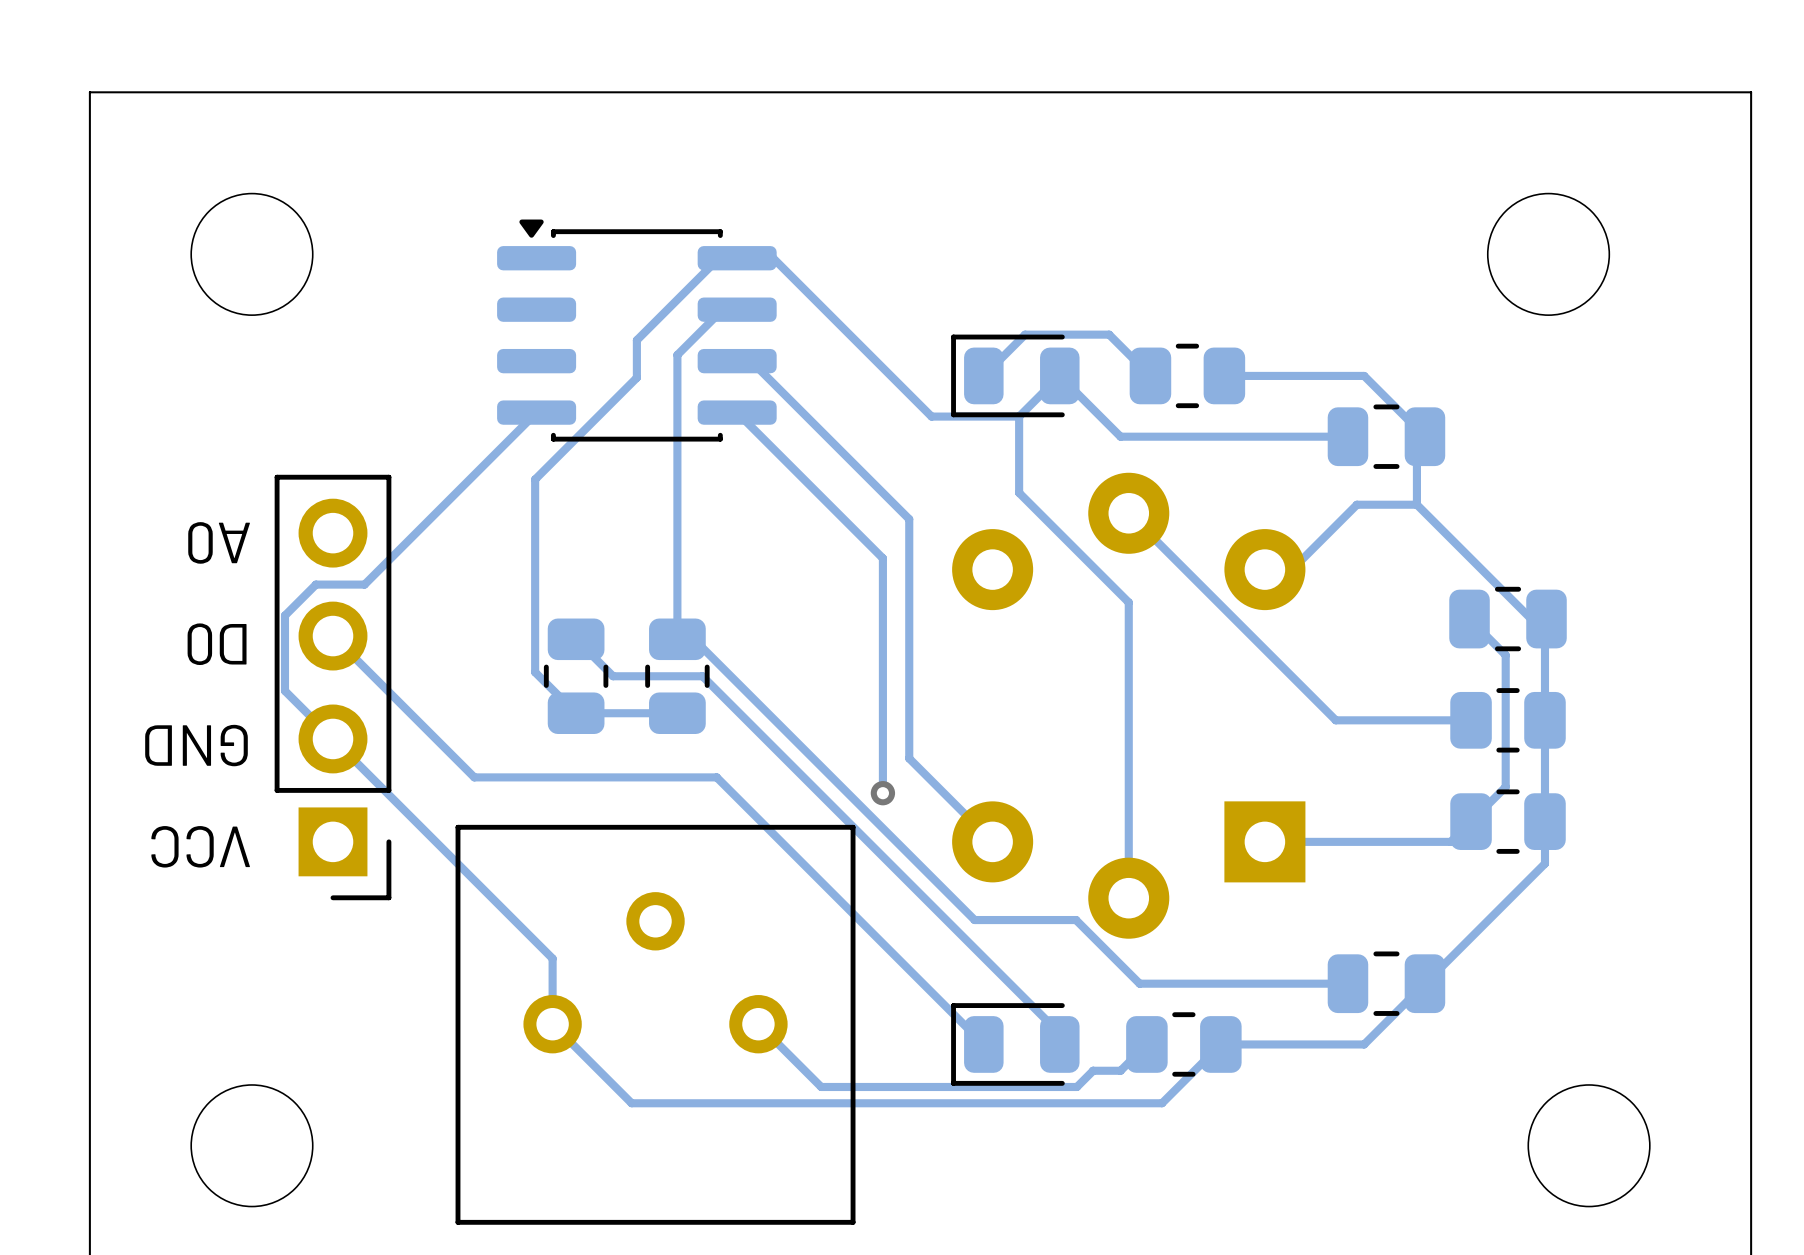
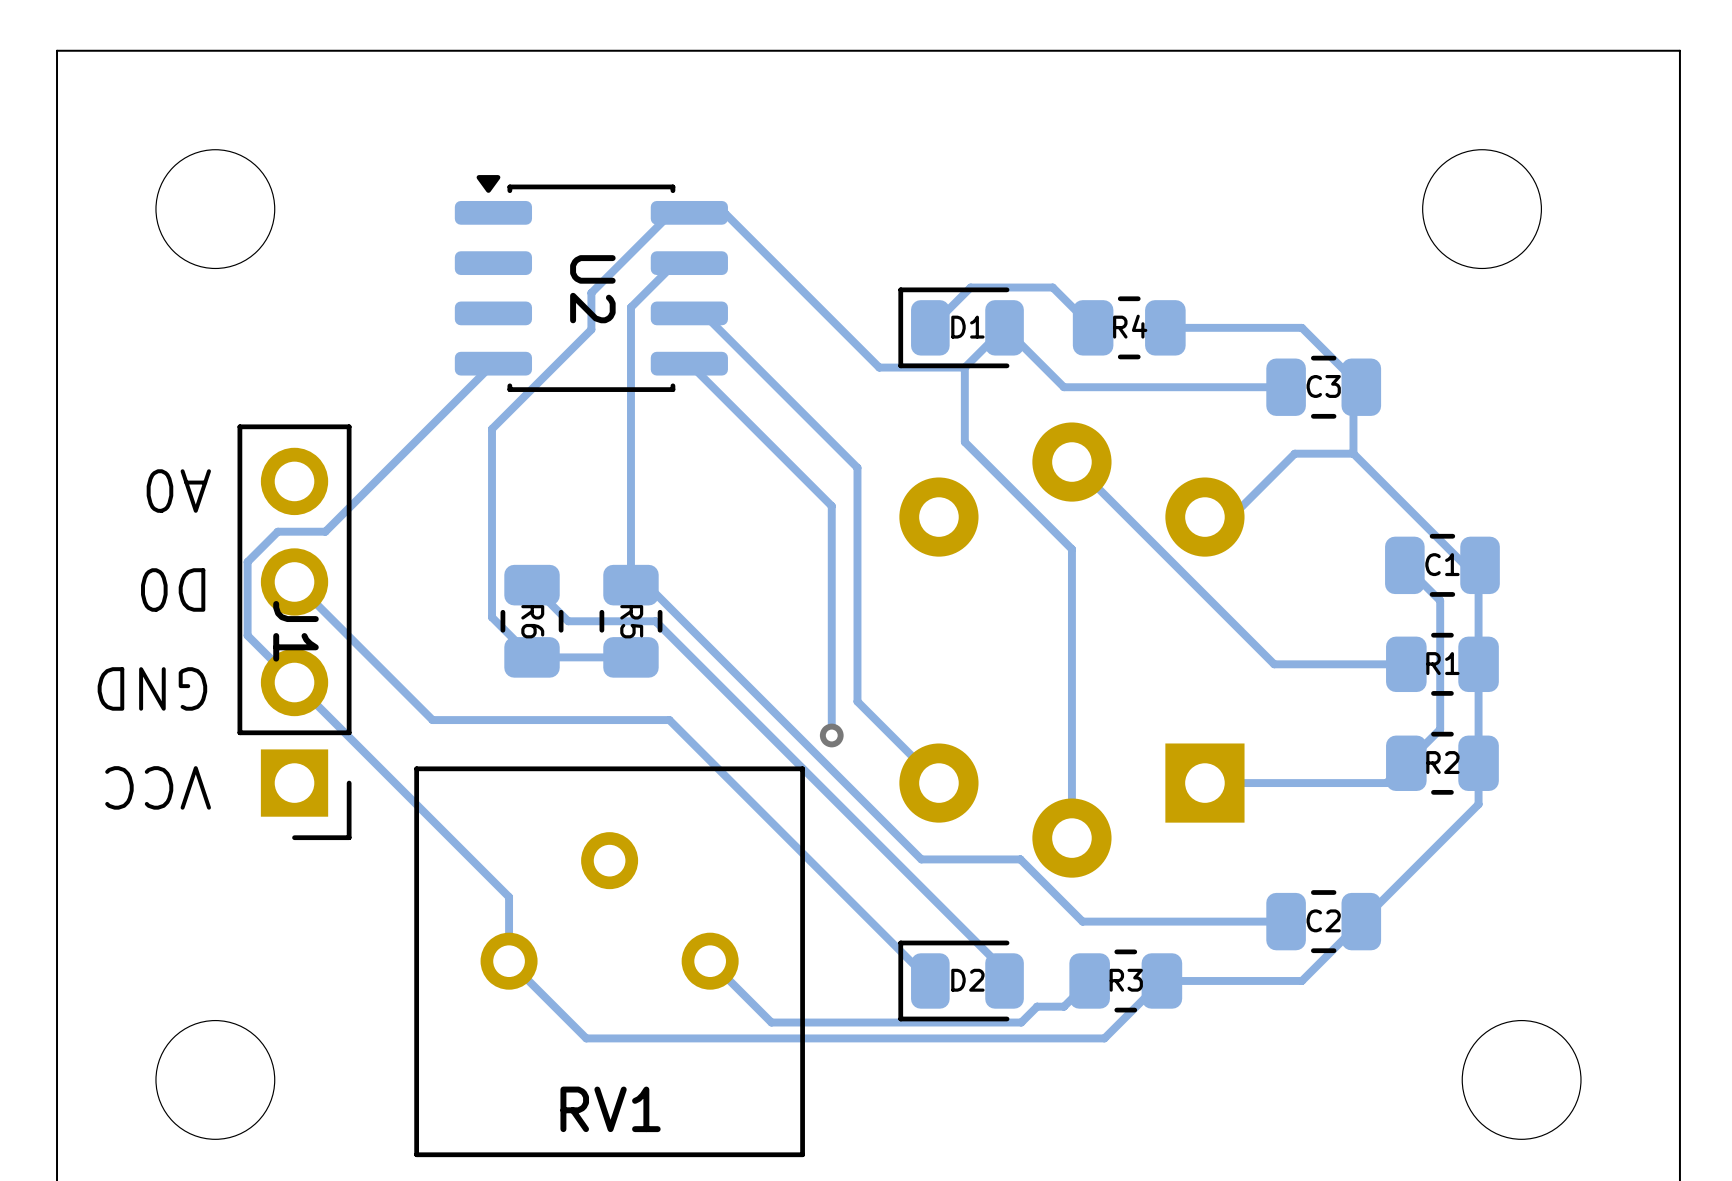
U2 name: none -> U2 (592, 289)
D1 name: none -> D1 (967, 327)
R4 name: none -> R4 (1130, 326)
C3 name: none -> C3 (1323, 386)
C1 name: none -> C1 (1442, 564)
R6 name: none -> R6 (532, 621)
R5 name: none -> R5 (631, 621)
J1 name: none -> J1 (295, 631)
R1 name: none -> R1 (1442, 663)
R2 name: none -> R2 (1442, 762)
C2 name: none -> C2 (1323, 920)
D2 name: none -> D2 (967, 980)
R3 name: none -> R3 (1126, 980)
RV1 name: none -> RV1 (610, 1109)

